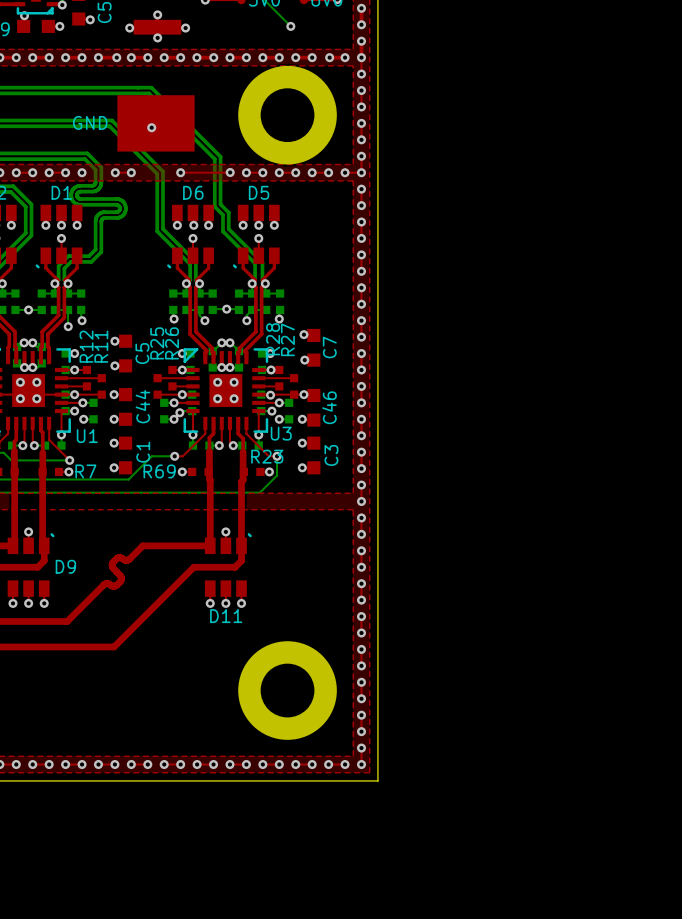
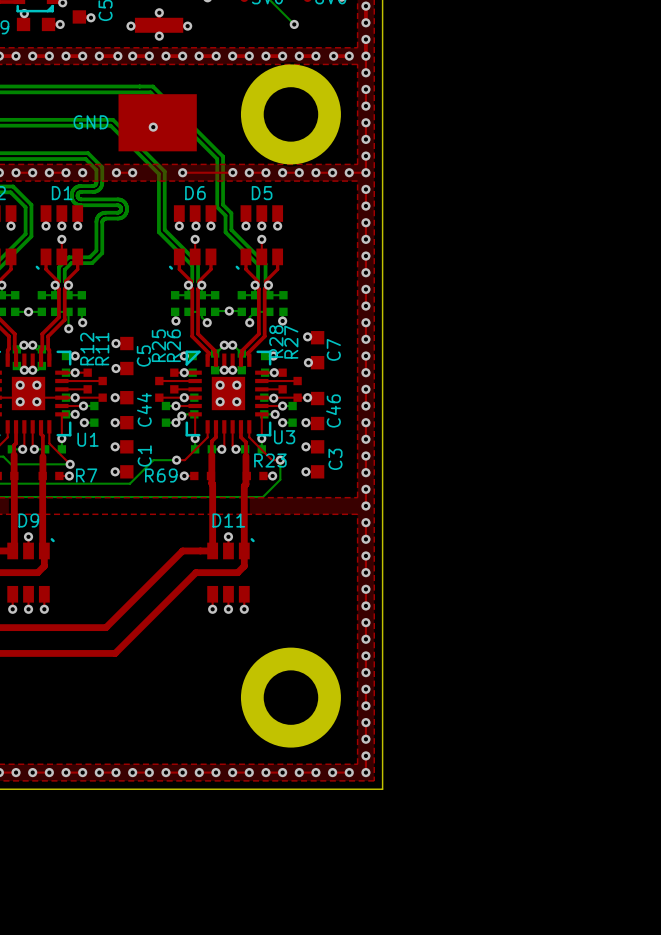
top track: (180, 545) (142, 545) (128, 559) (119, 557) (113, 561) (112, 566) (116, 571) -> none
D9 name position: D9 (65, 566) -> D9 (28, 520)
top track: (116, 572) (121, 578) (117, 584) (113, 586) (104, 584) (67, 621) -> (182, 550) (106, 627) (67, 627)
D11 name position: D11 (226, 616) -> D11 (228, 520)

